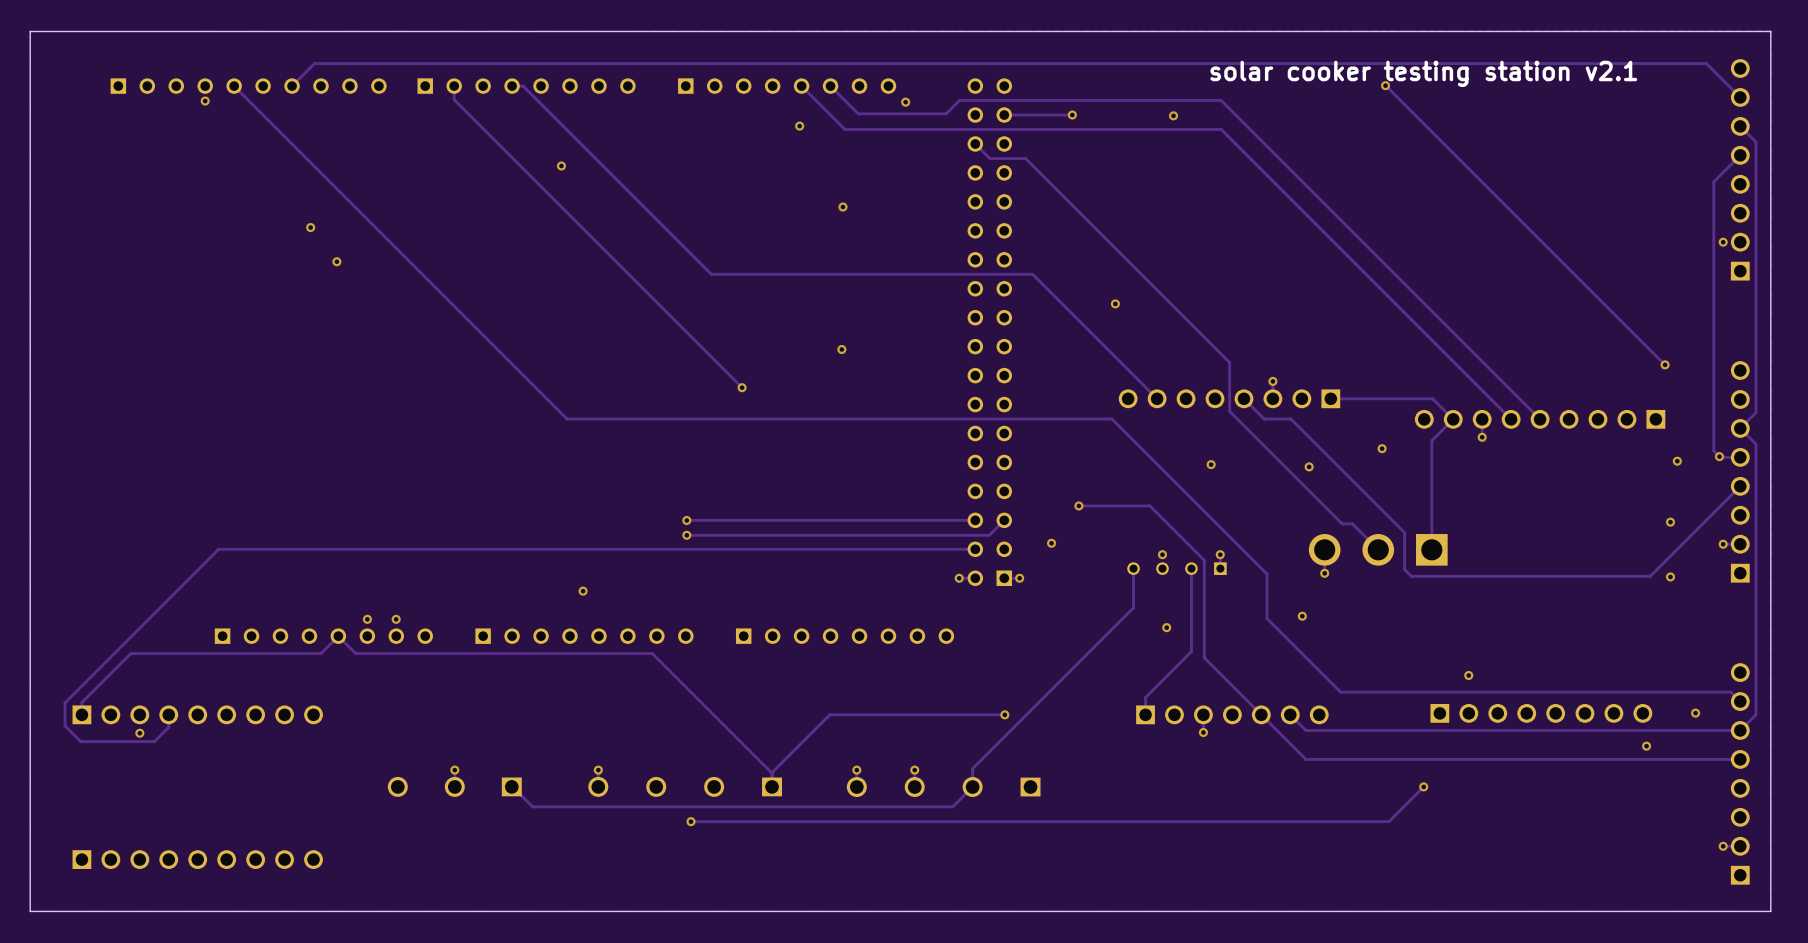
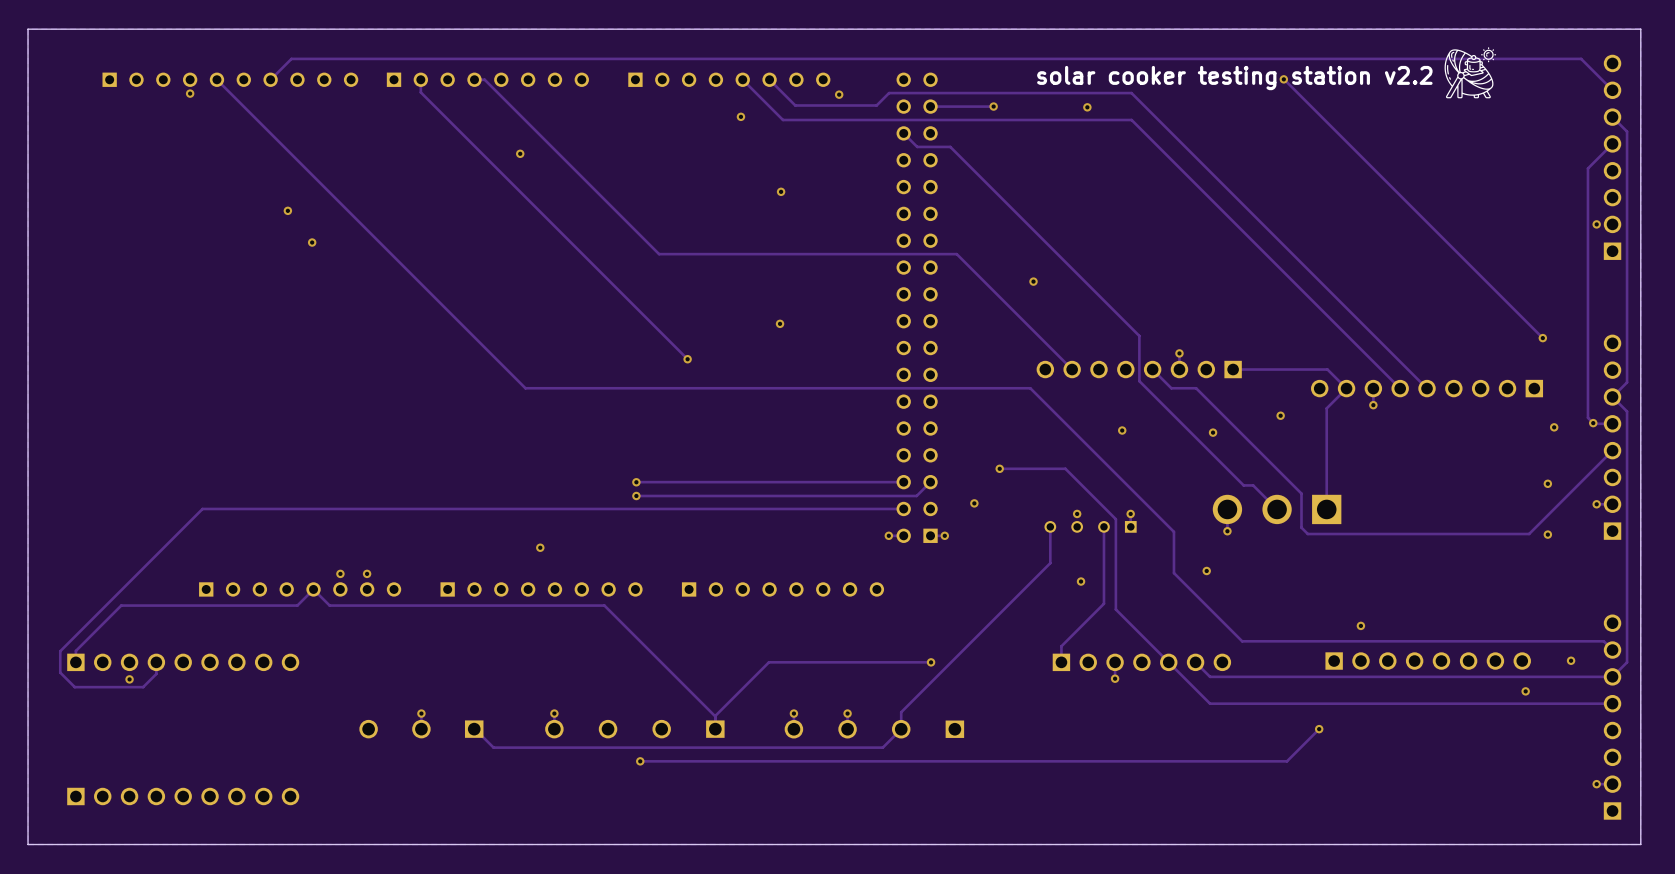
drawing: none -> [1444, 47, 1497, 99]
text: solar cooker testing station v2.1 (1423, 73) -> solar cooker testing station v2.2 (1234, 78)

